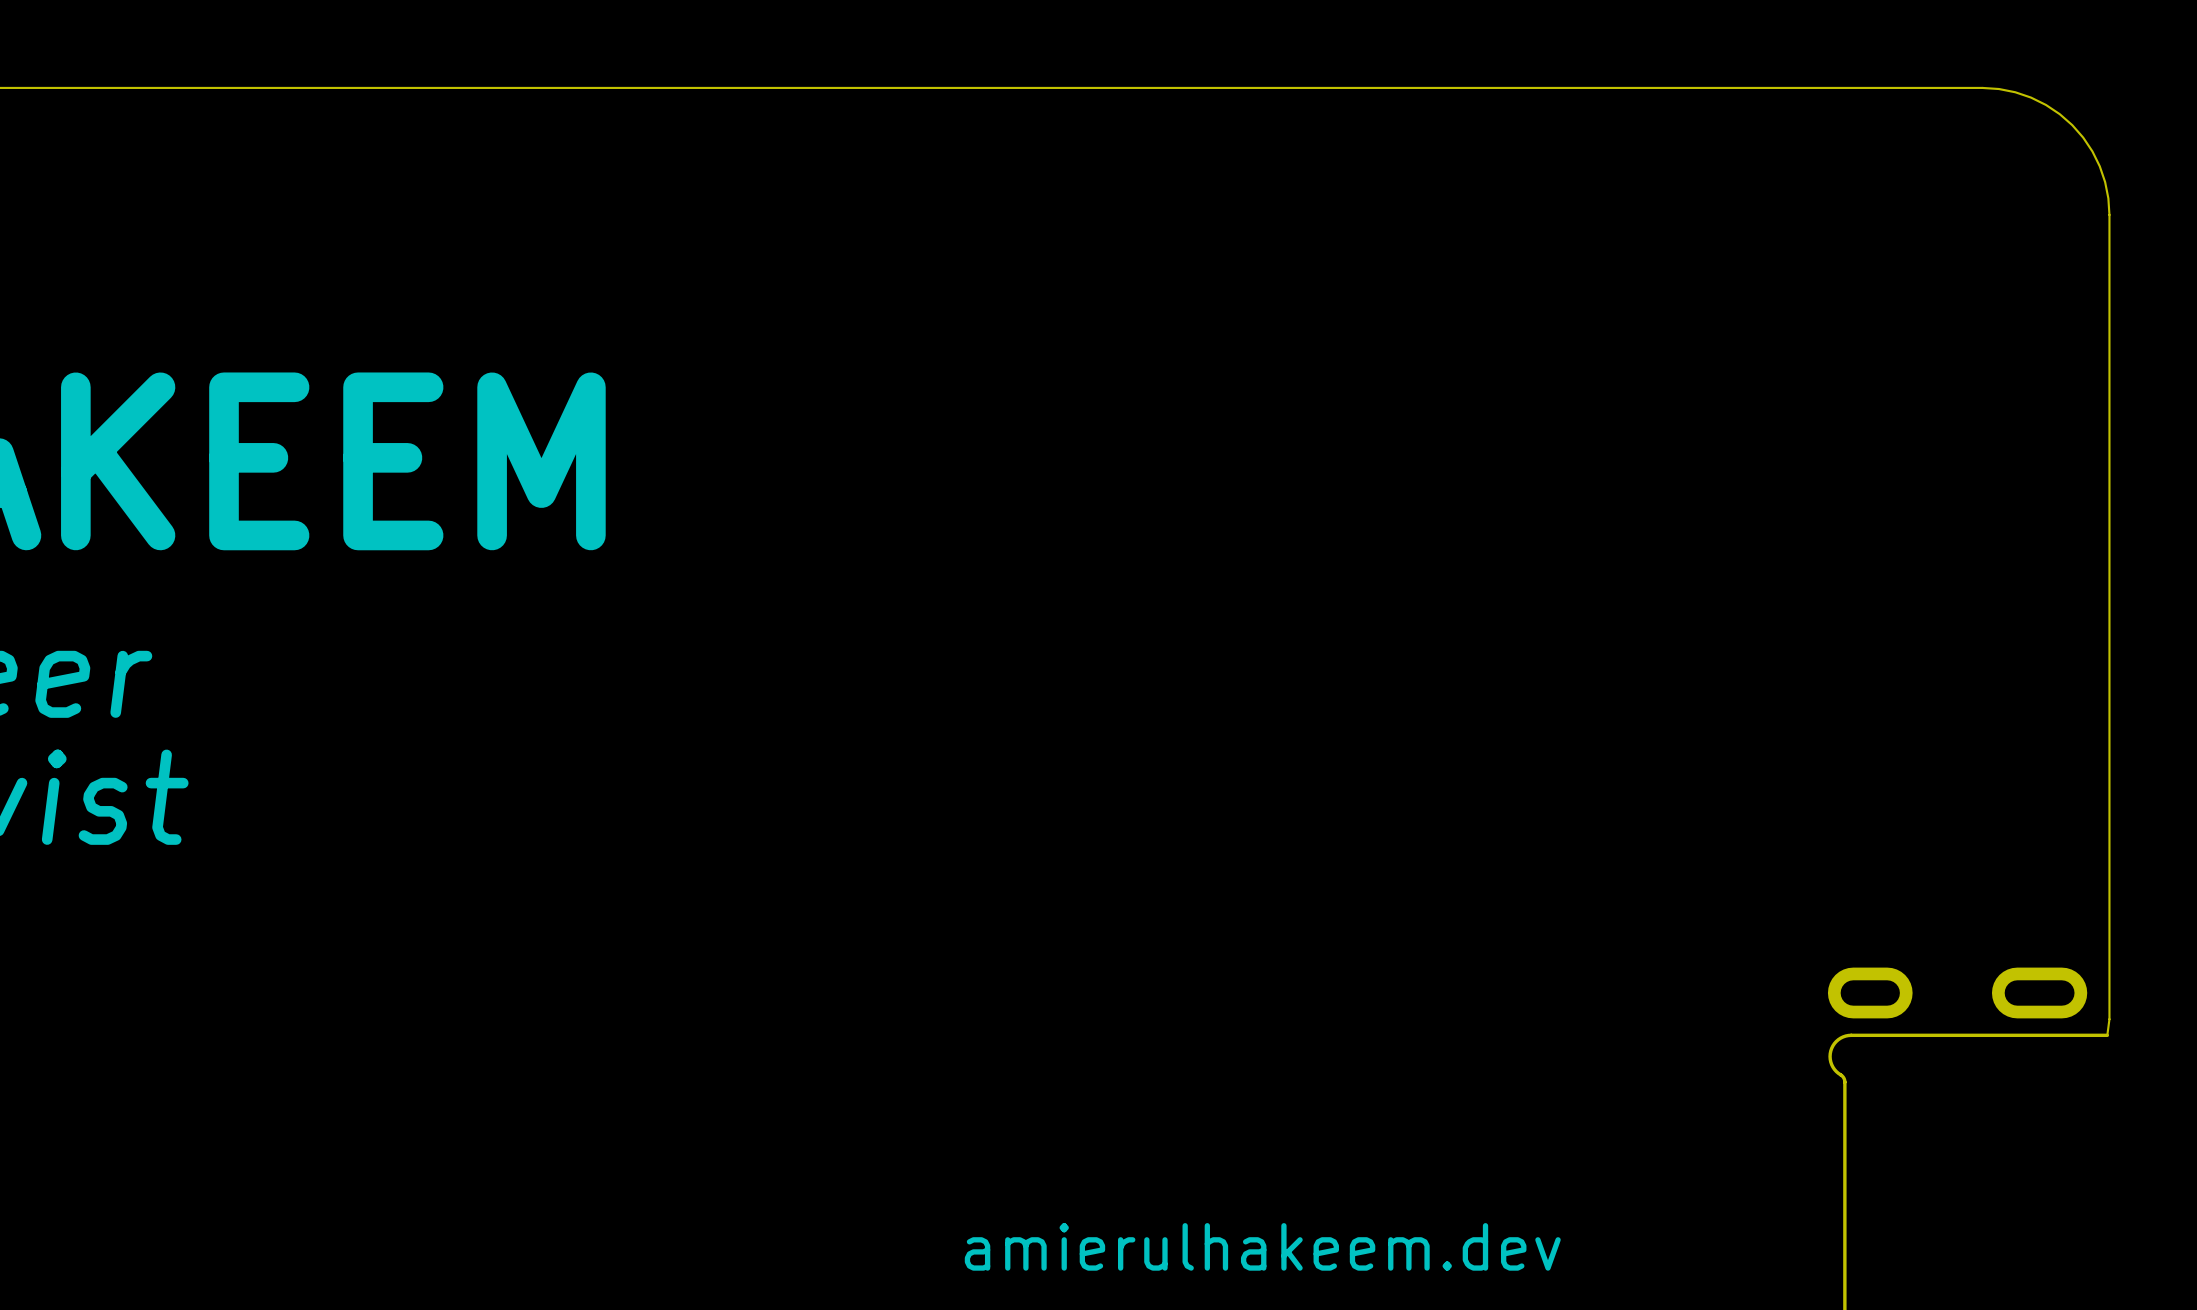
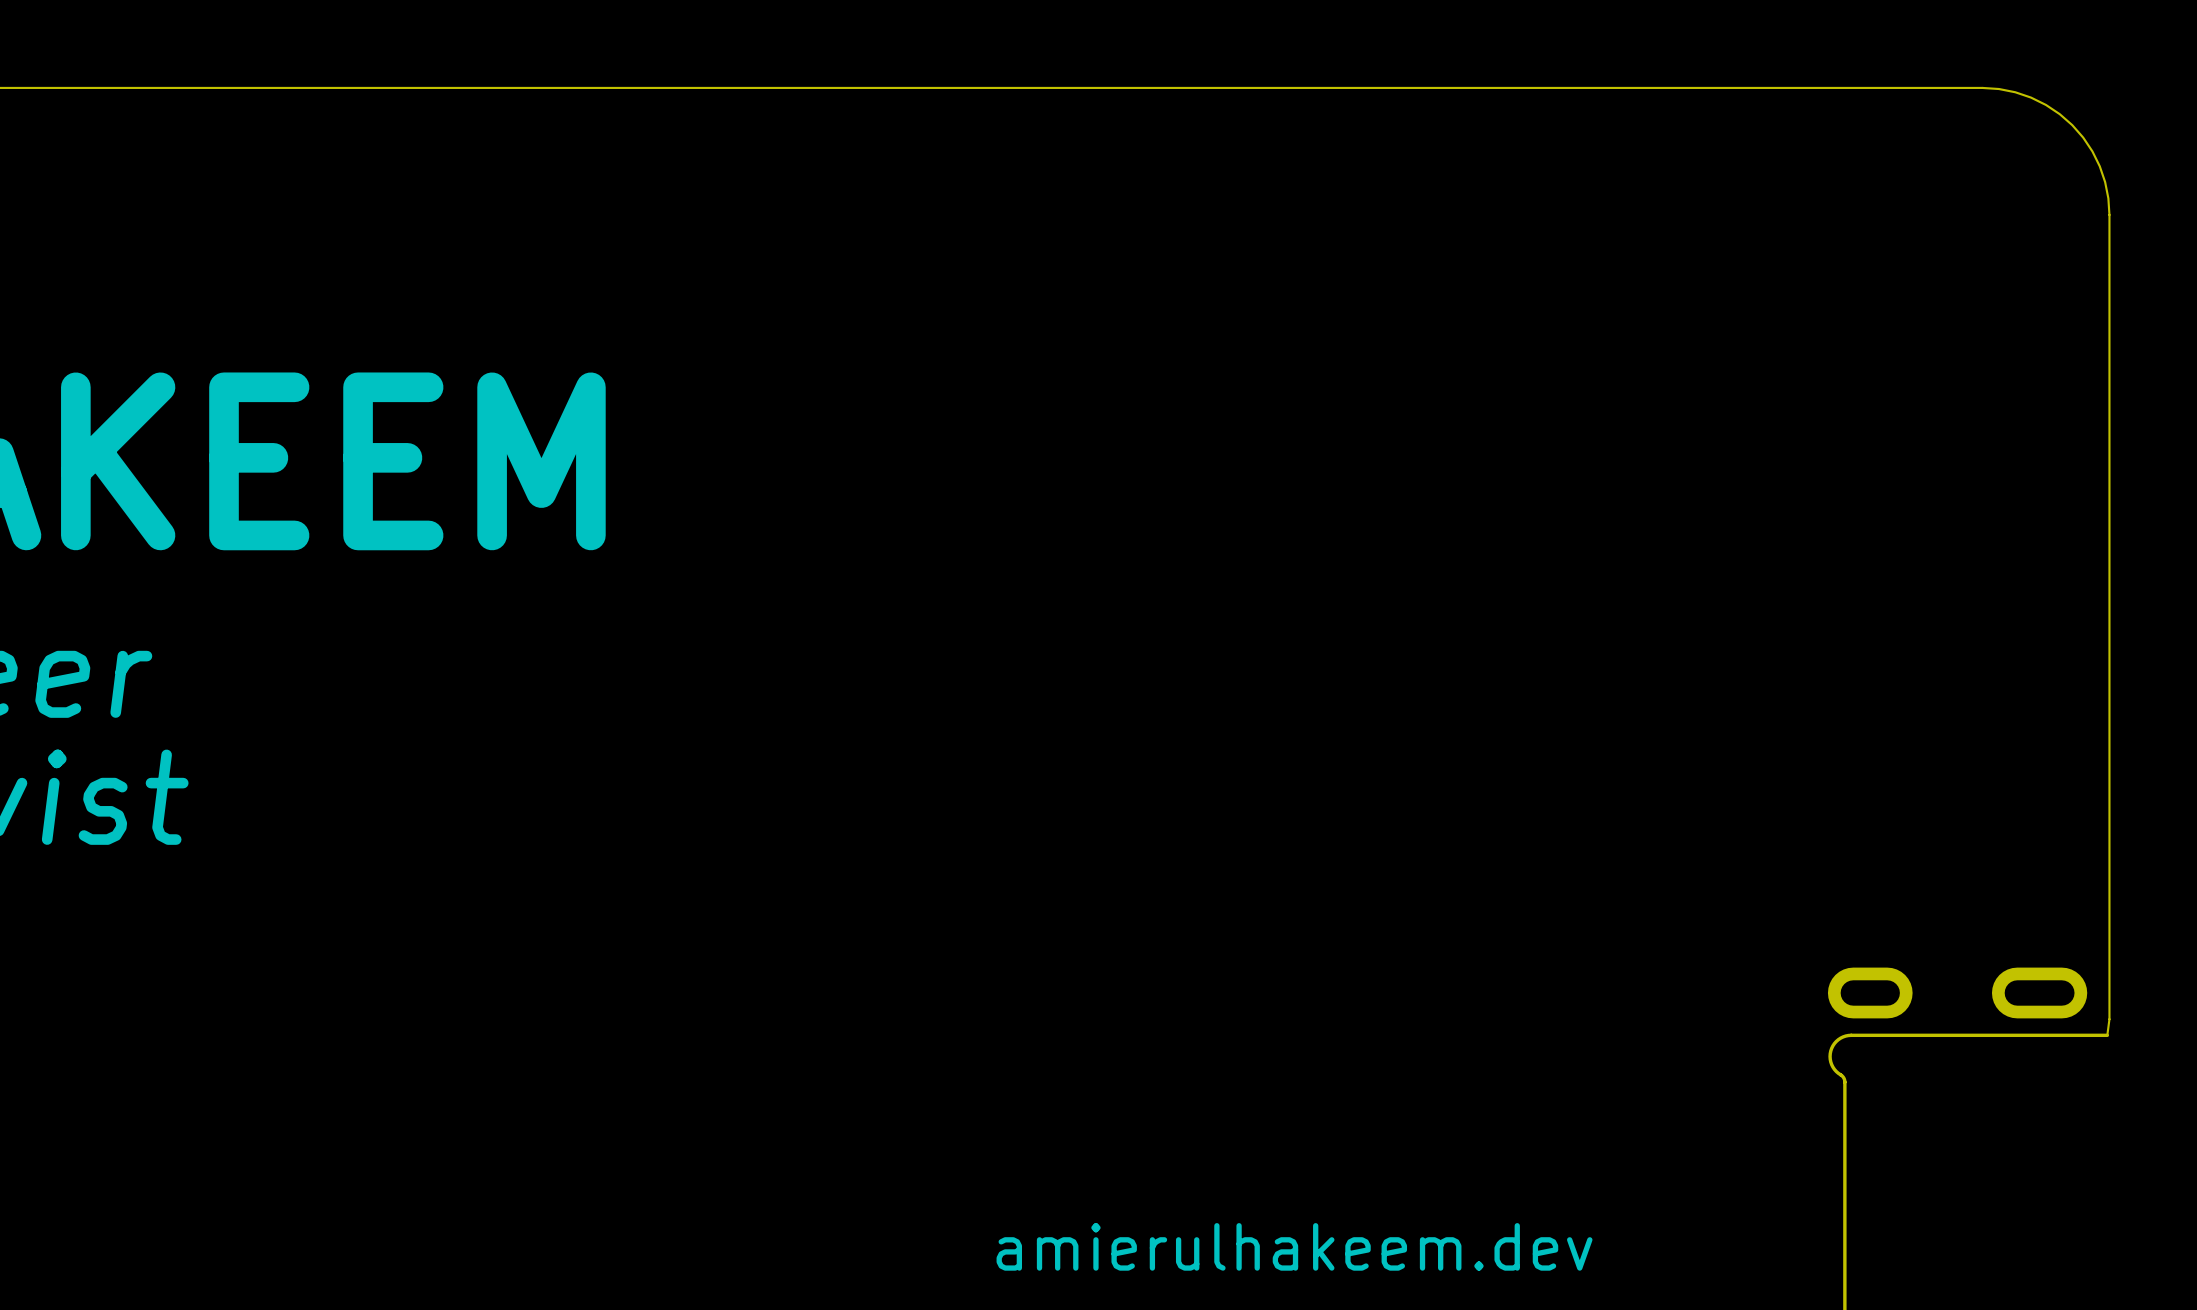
text position: amierulhakeem.dev (1262, 1246) -> amierulhakeem.dev (1294, 1246)

